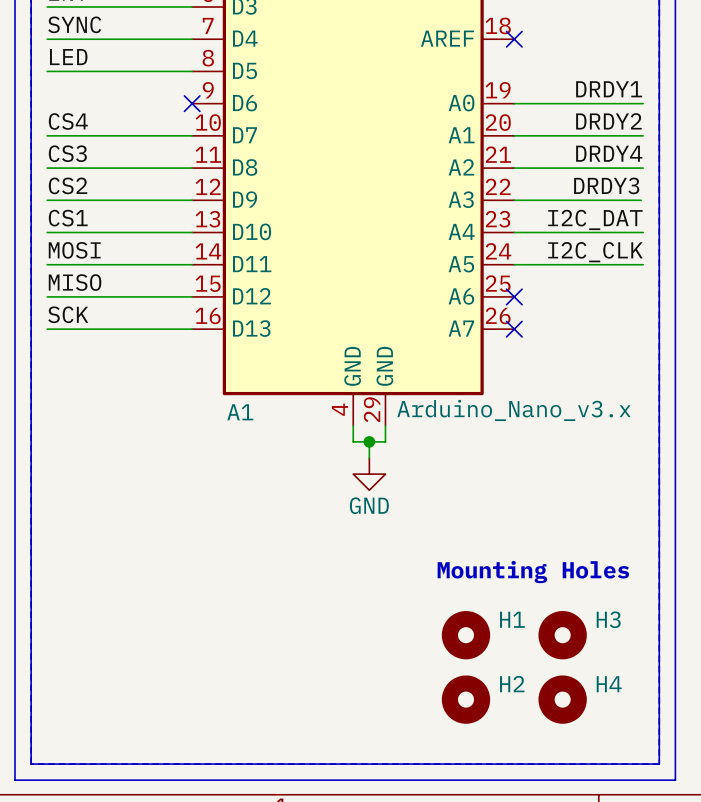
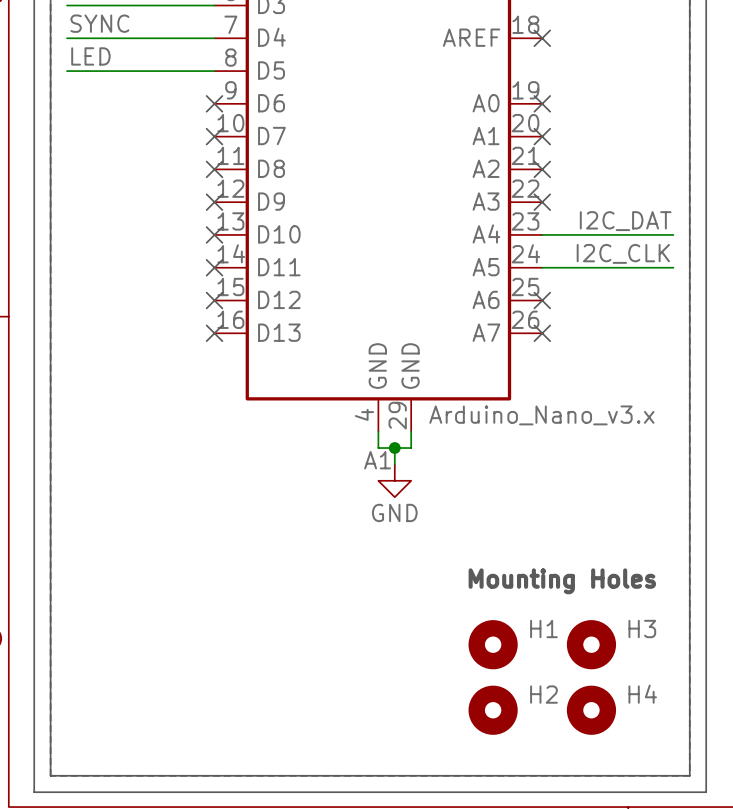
label: DRDY1 (609, 89) -> none
wire: (514, 103) (643, 103) -> none
no-connect mark: none -> (542, 103)
label: CS4 (68, 121) -> none
label: DRDY2 (608, 121) -> none
wire: (47, 135) (192, 135) -> none
no-connect mark: none -> (214, 136)
wire: (514, 135) (643, 135) -> none
no-connect mark: none -> (542, 136)
label: CS3 (67, 153) -> none
label: DRDY4 (609, 153) -> none
wire: (47, 168) (192, 168) -> none
no-connect mark: none -> (214, 169)
wire: (514, 168) (643, 168) -> none
no-connect mark: none -> (542, 169)
label: CS2 (68, 185) -> none
label: DRDY3 (606, 185) -> none
wire: (47, 200) (192, 200) -> none
no-connect mark: none -> (214, 202)
wire: (514, 200) (641, 200) -> none
no-connect mark: none -> (542, 202)
label: CS1 (68, 218) -> none
wire: (47, 232) (192, 232) -> none
no-connect mark: none -> (214, 234)
label: MOSI (74, 250) -> none
wire: (47, 264) (192, 264) -> none
no-connect mark: none -> (214, 267)
label: MISO (75, 282) -> none
wire: (47, 296) (192, 296) -> none
no-connect mark: none -> (214, 300)
label: SCK (68, 314) -> none
wire: (47, 329) (192, 329) -> none
no-connect mark: none -> (214, 333)
A1 name position: A1 (240, 412) -> A1 (377, 460)

